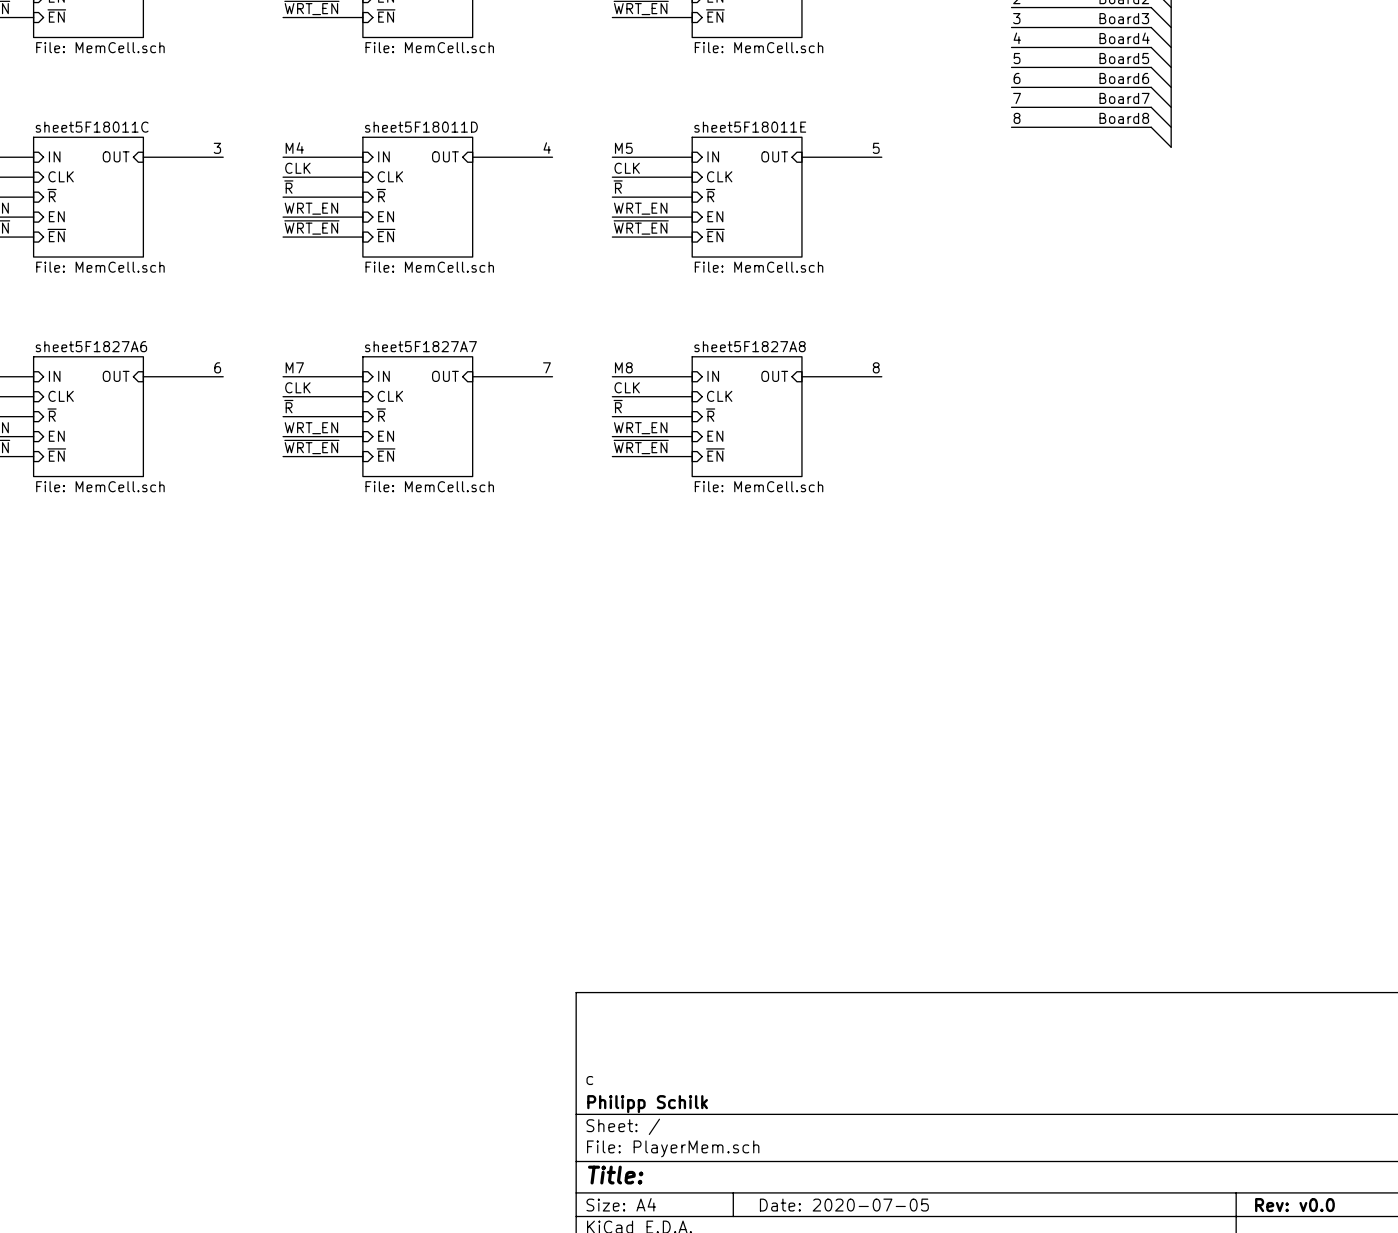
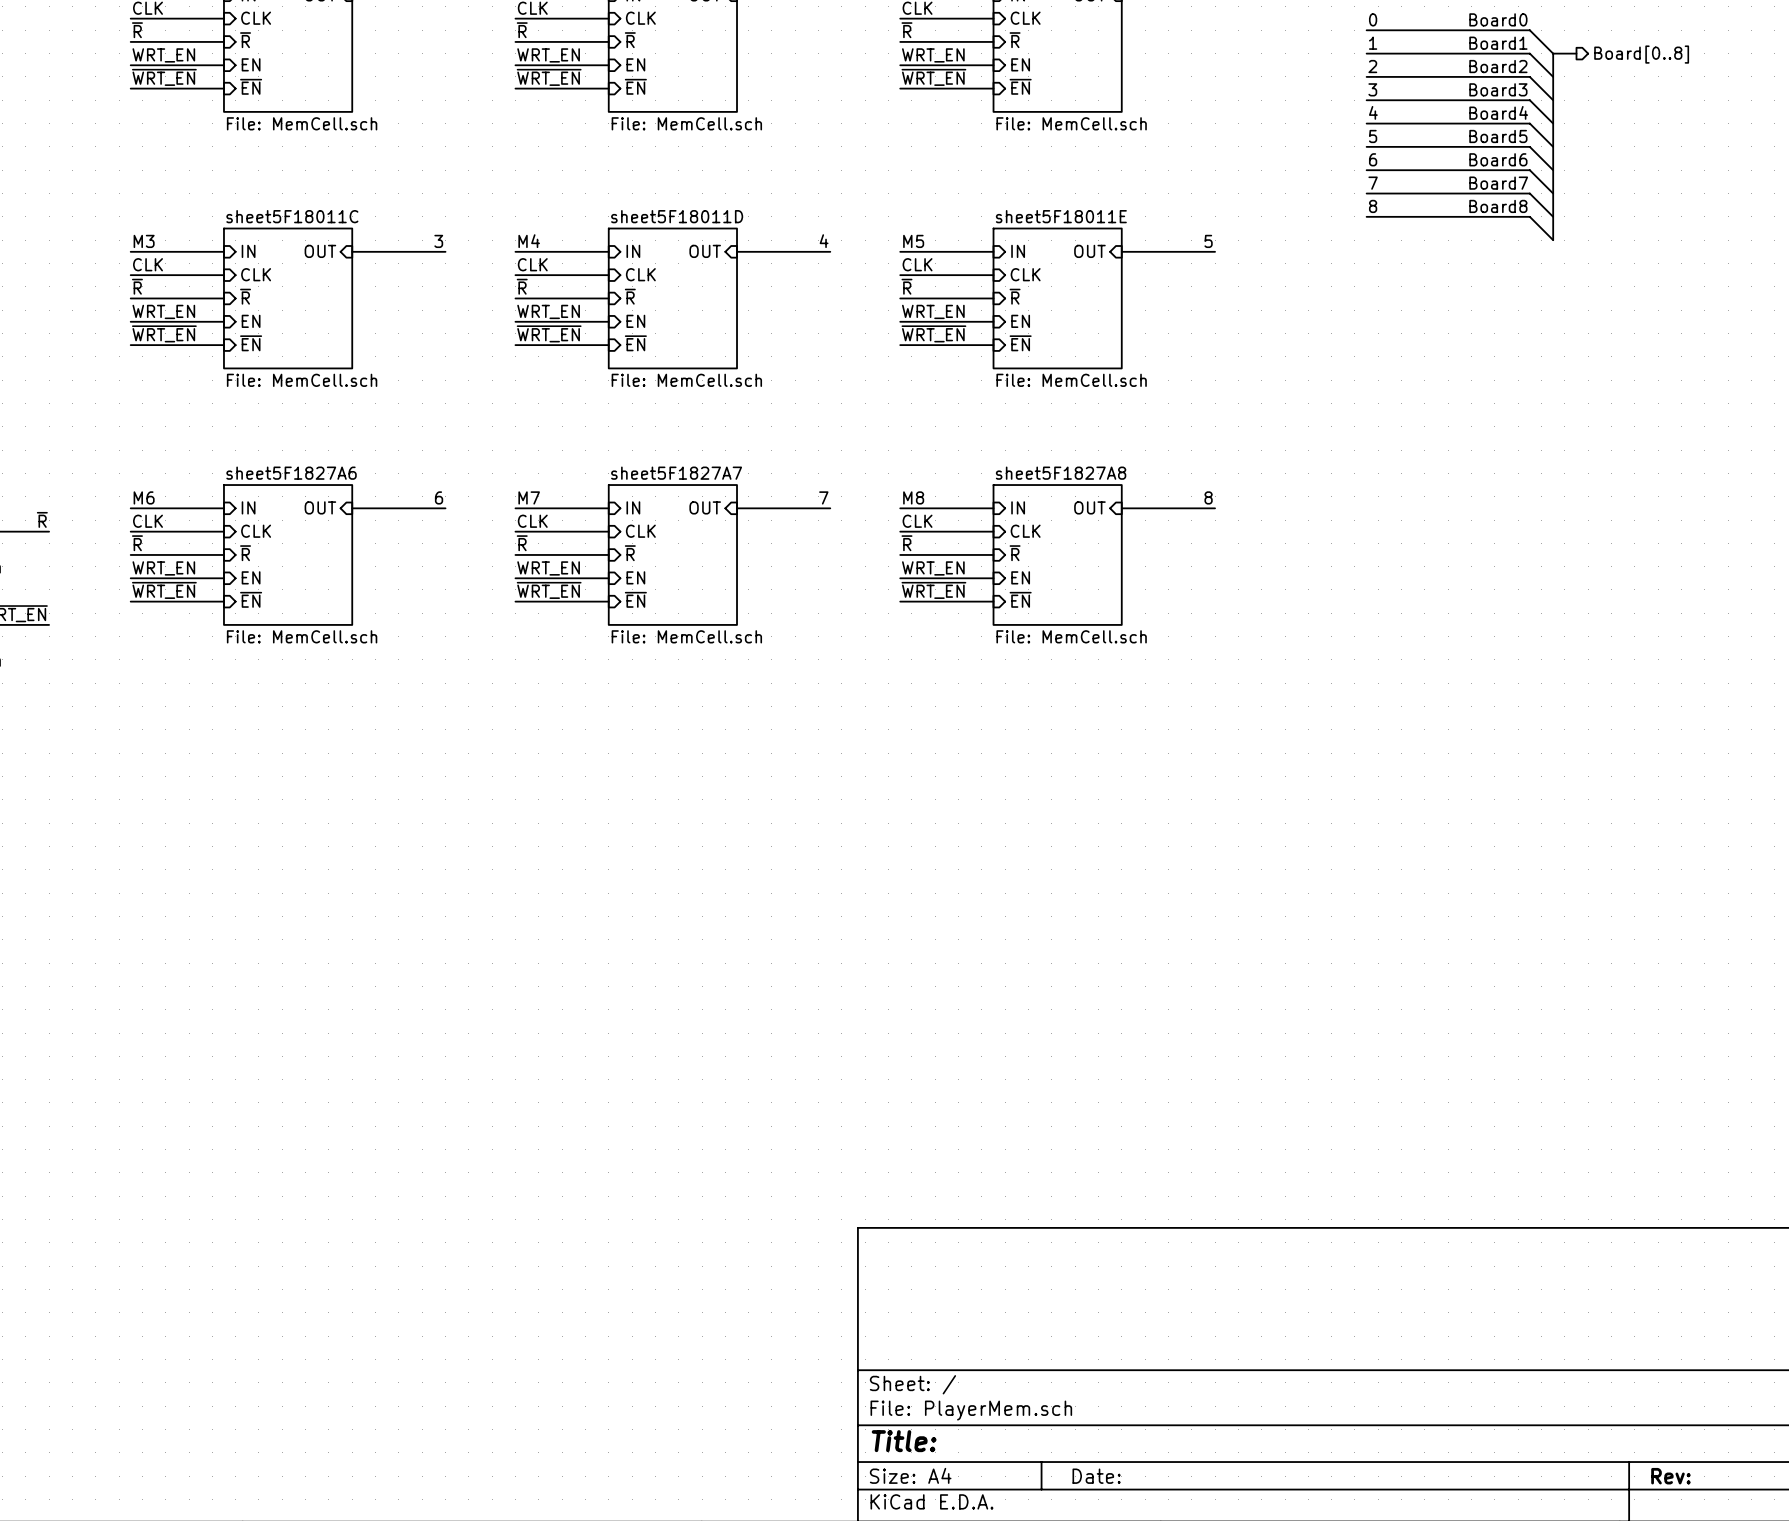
title block: c (589, 1080) -> none
title block: Philipp Schilk (647, 1104) -> none
title block: Date: 2020-07-05 (844, 1205) -> Date: (1096, 1476)
title block: Rev: v0.0 (1294, 1205) -> Rev: (1670, 1476)

